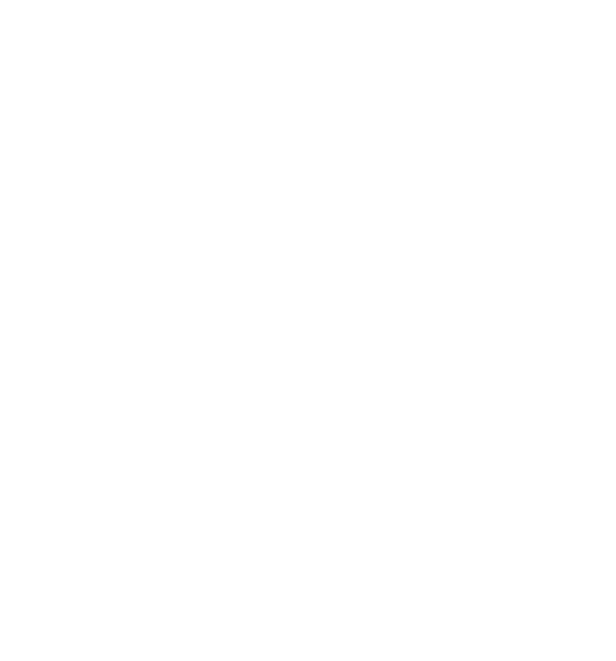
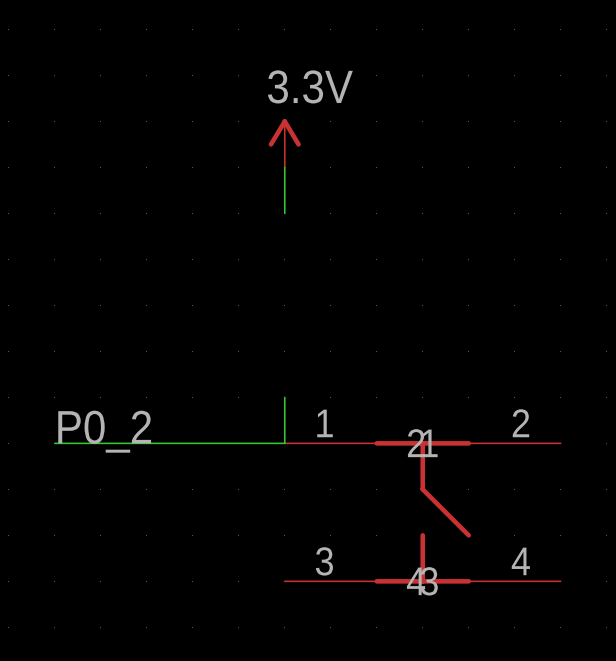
power symbol: none -> 3.3V (284, 143)
wire: none -> (284, 167) (284, 213)
wire: none -> (284, 397) (284, 443) (54, 443)
label: none -> P0_2 (104, 431)
part: none -> (422, 512)

